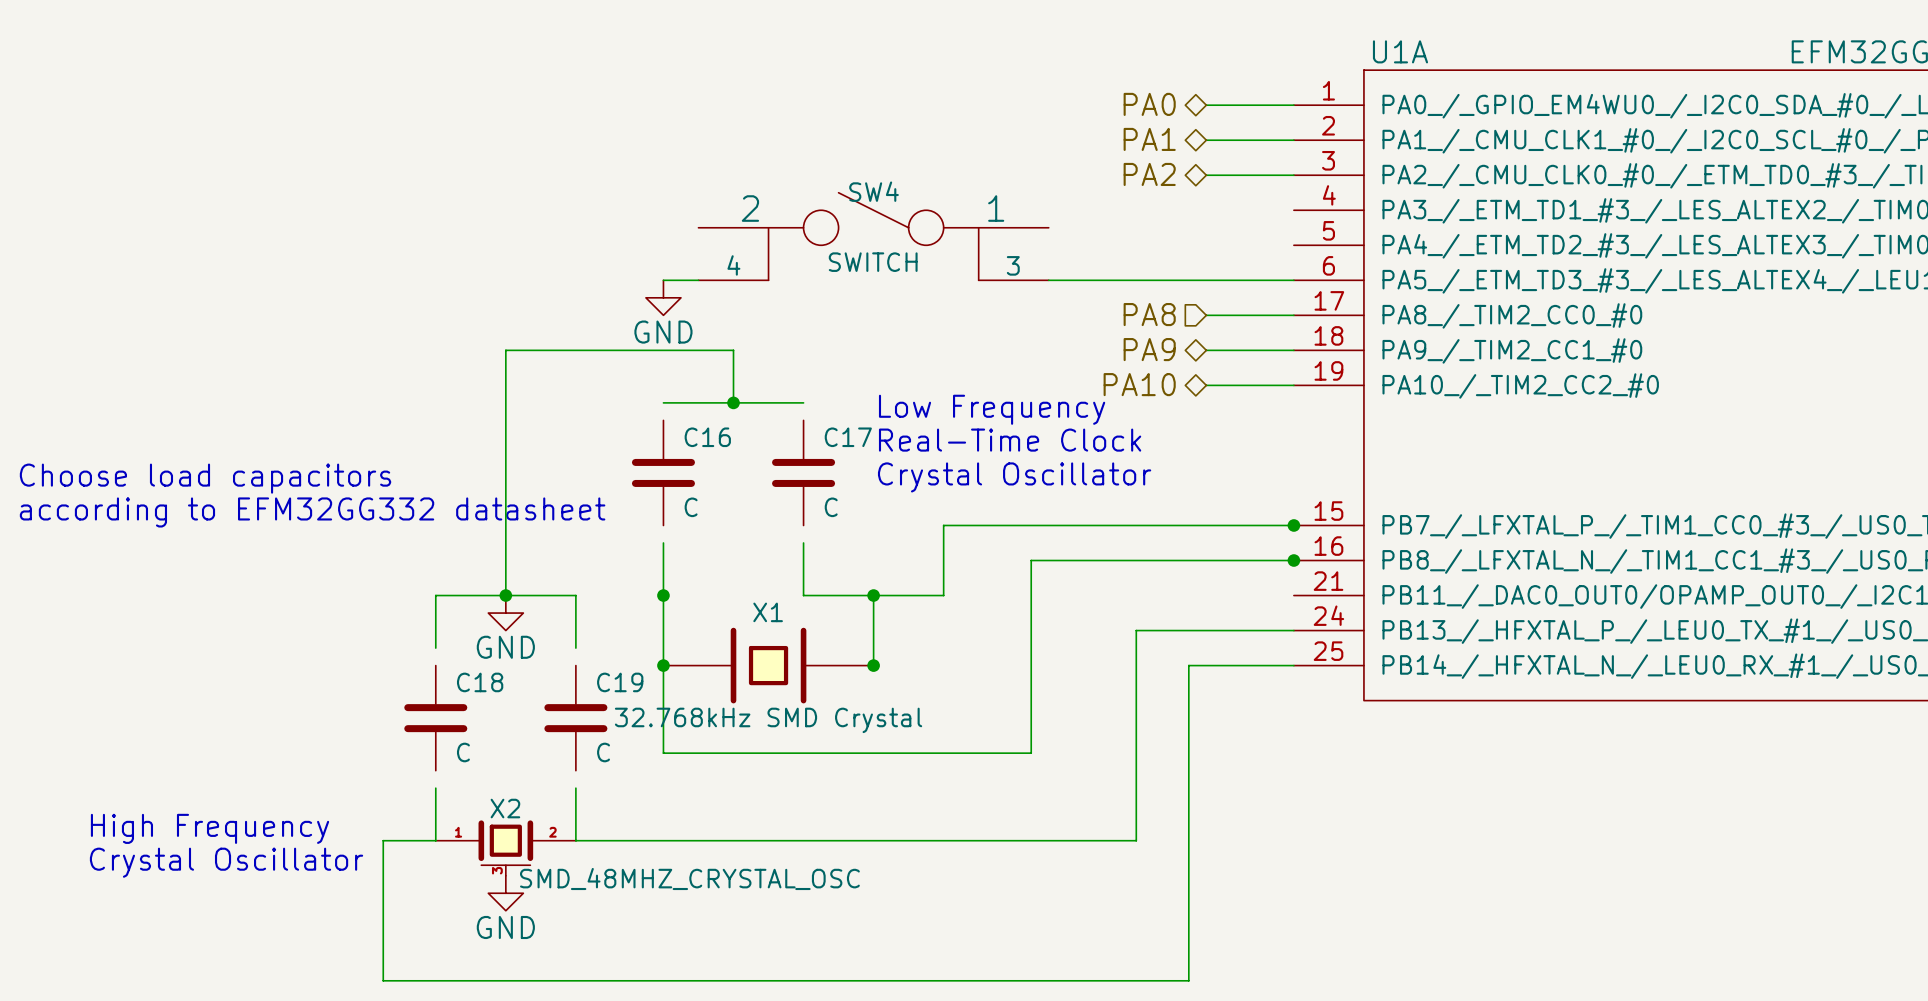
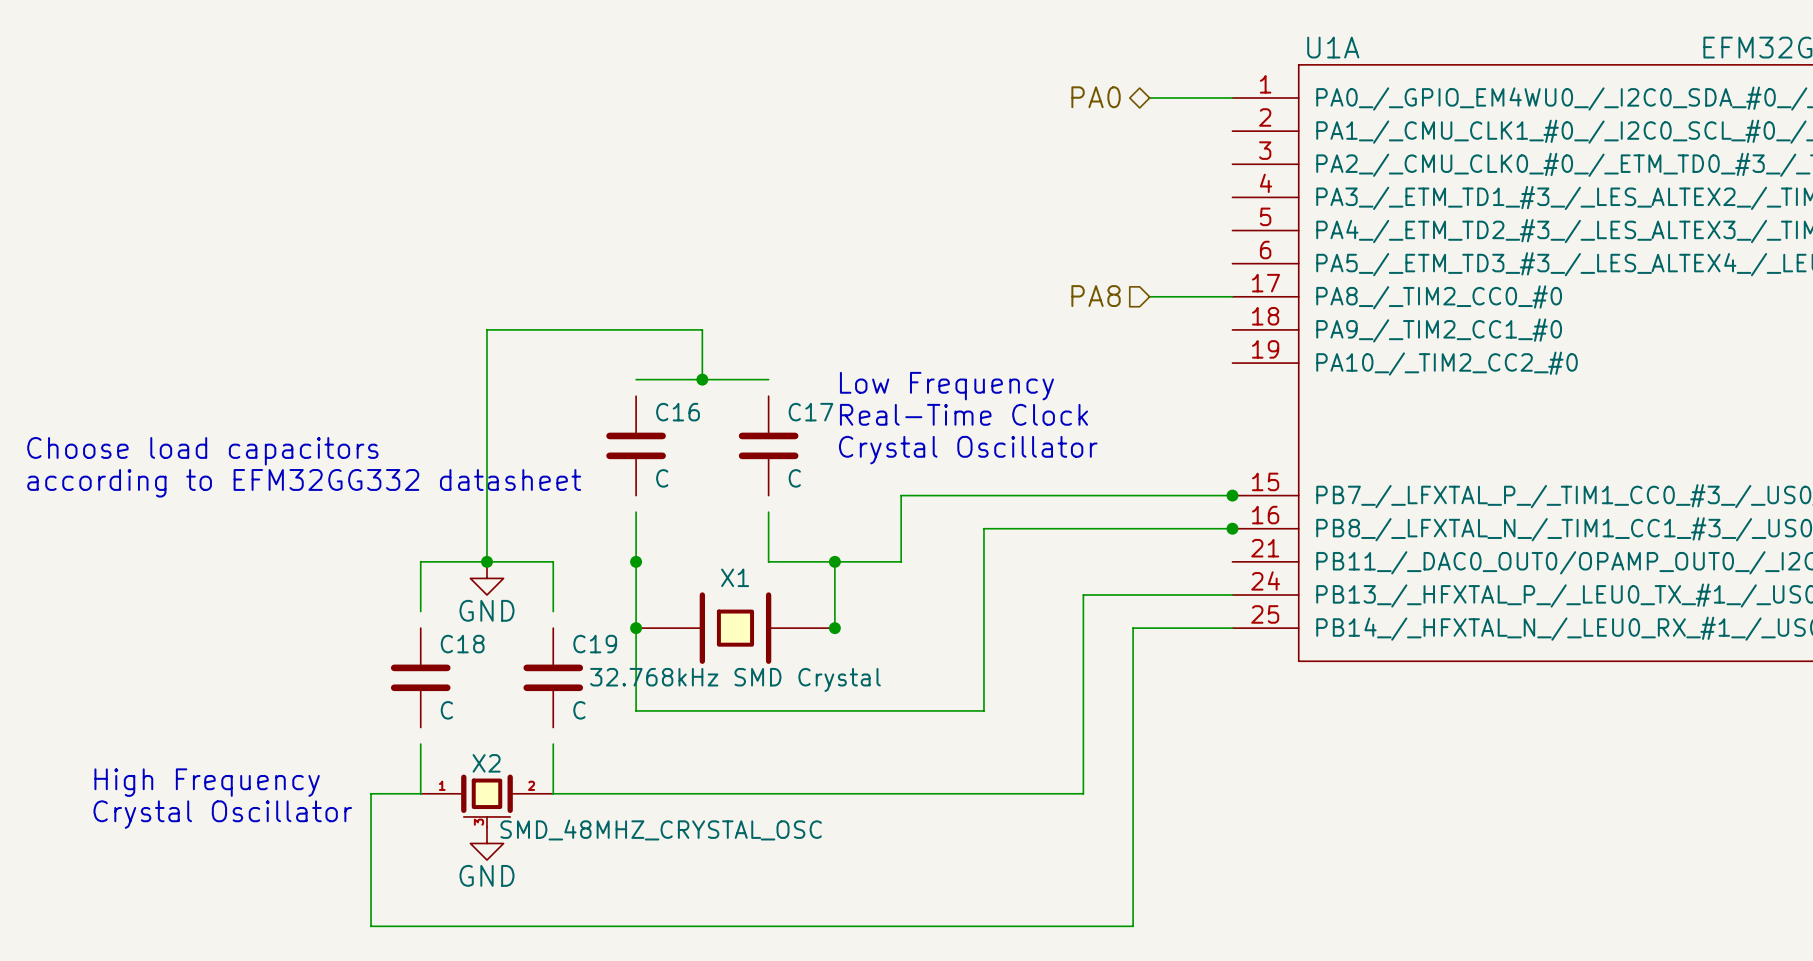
hierarchical label: PA1 (1149, 139) -> none
wire: (1206, 140) (1293, 140) -> none
hierarchical label: PA2 (1149, 174) -> none
wire: (1206, 175) (1293, 175) -> none
SW4: SWITCH (873, 236) -> none
wire: (663, 280) (698, 280) -> none
wire: (1048, 280) (1293, 280) -> none
power symbol: GND (663, 297) -> none
hierarchical label: PA9 (1149, 349) -> none
wire: (1206, 350) (1293, 350) -> none
hierarchical label: PA10 (1139, 384) -> none
wire: (1206, 385) (1293, 385) -> none

